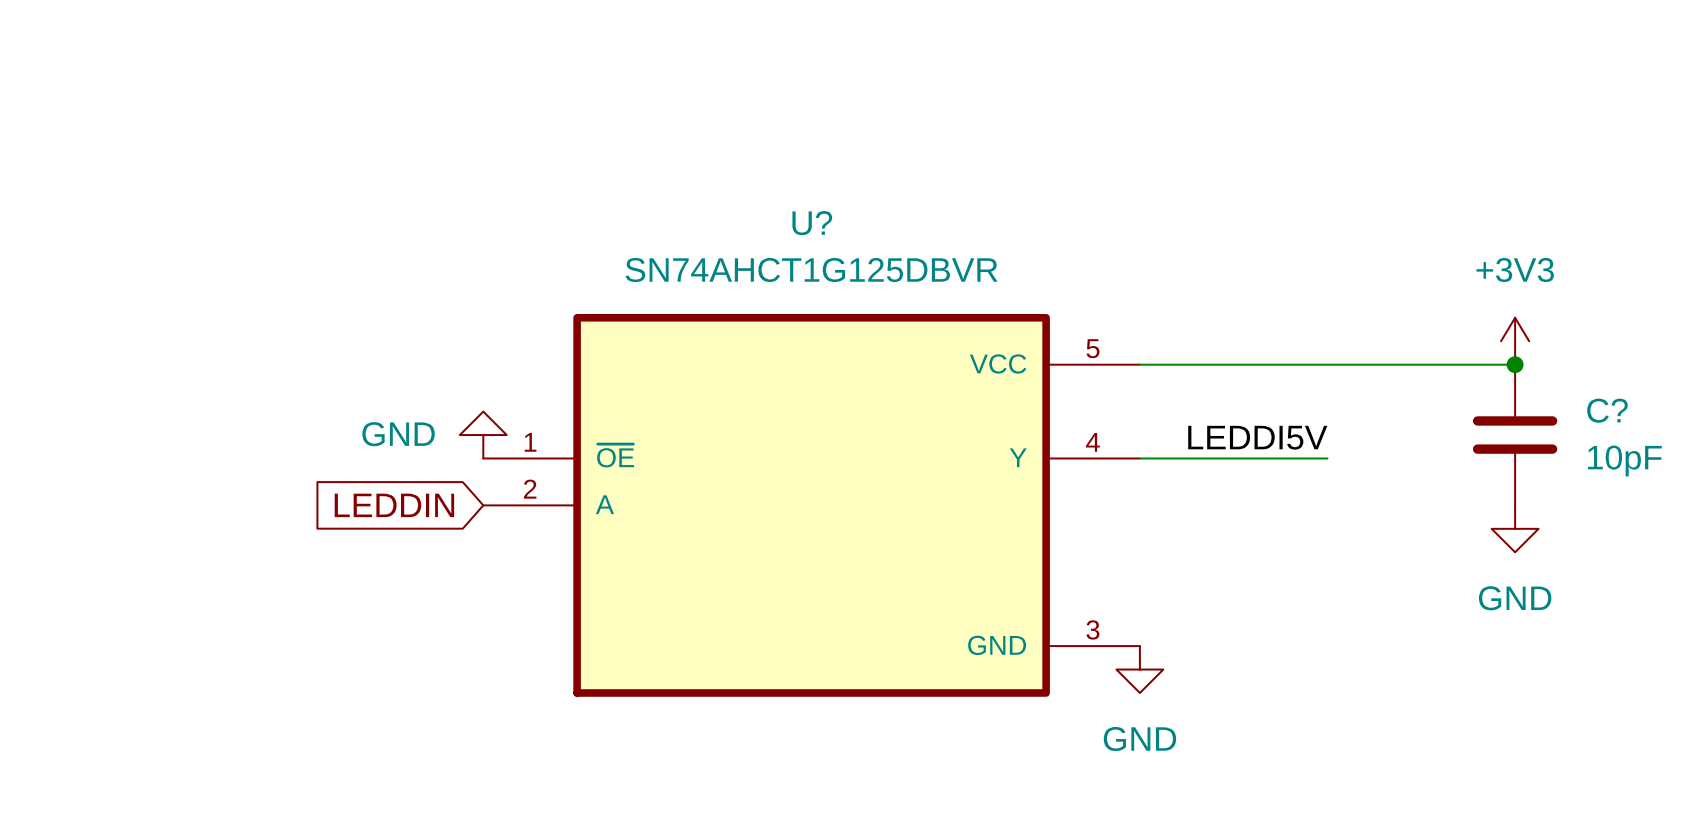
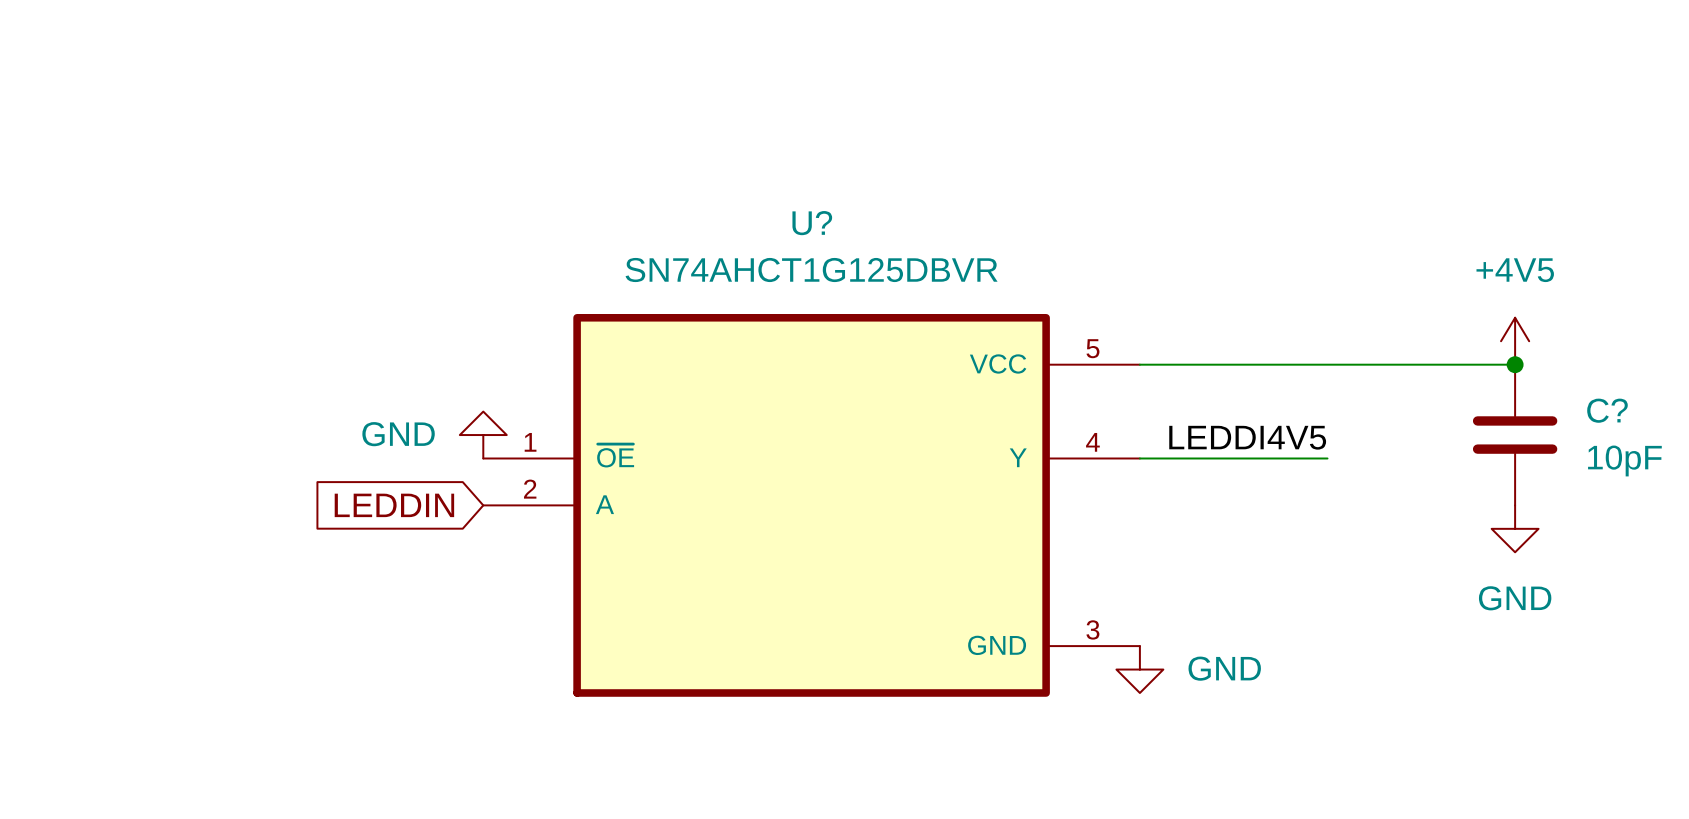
power symbol: +3V3 (1515, 341) -> +4V5 (1515, 341)
label: LEDDI5V (1257, 437) -> LEDDI4V5 (1247, 437)
power symbol text position: GND (1139, 739) -> GND (1224, 668)

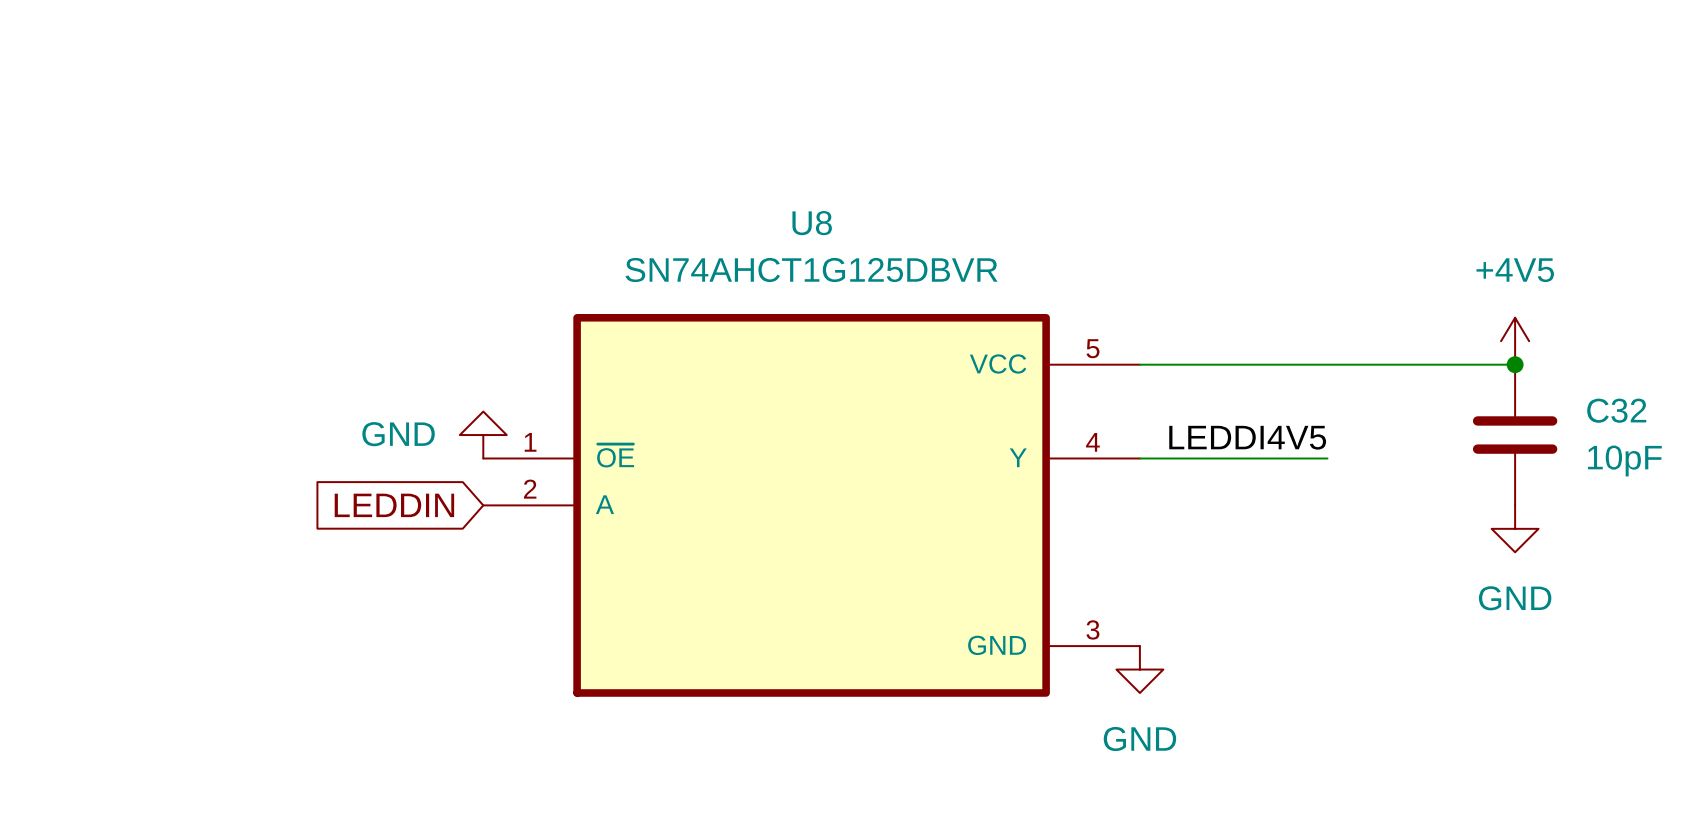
U? name: U? (812, 223) -> U8 (812, 223)
C? name: C? (1607, 410) -> C32 (1616, 410)
power symbol text position: GND (1224, 668) -> GND (1139, 739)

